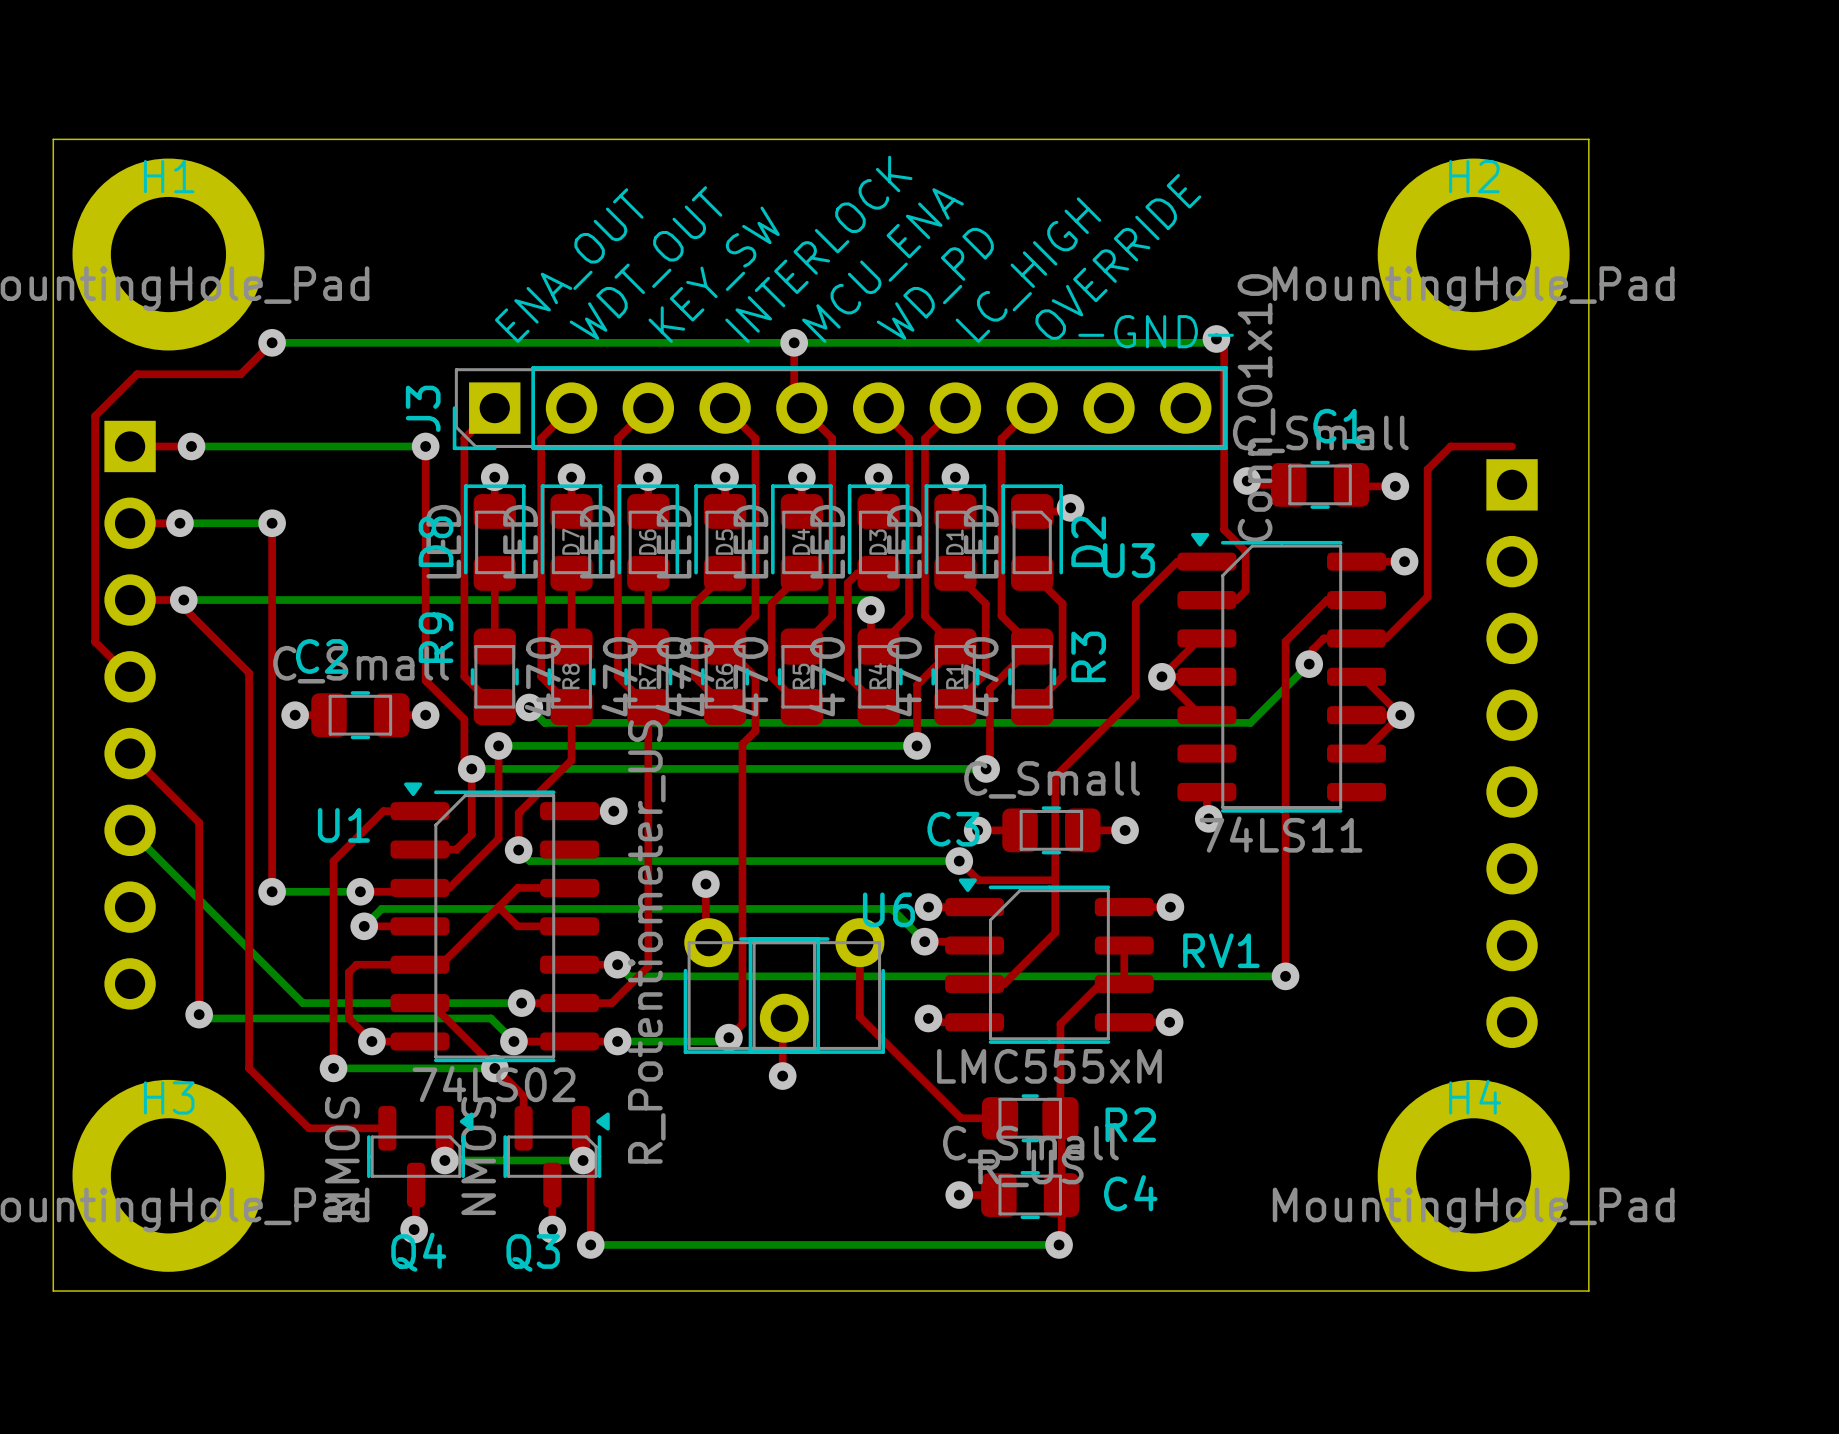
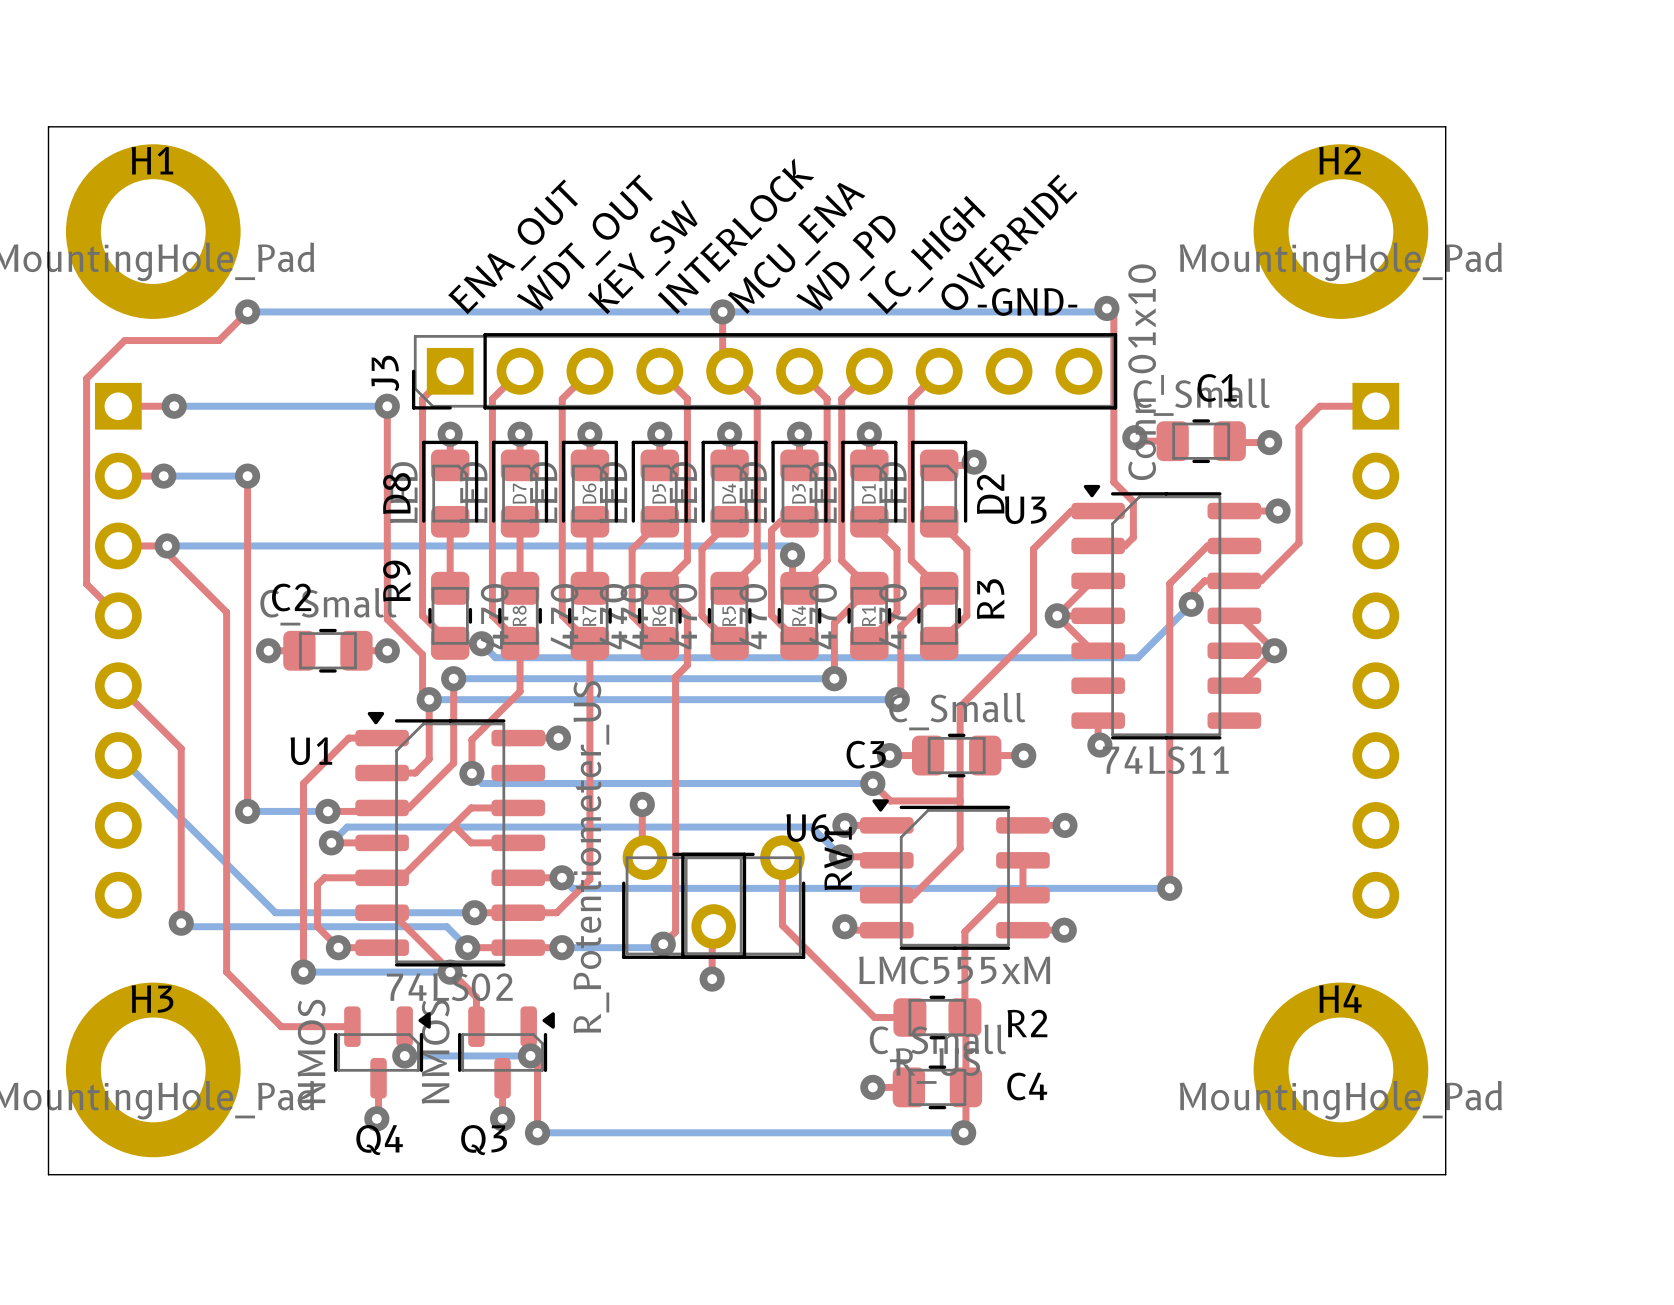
part position: (1512, 753) -> (1375, 650)
RV1 name rotation: 0° (1221, 950) -> 90° counterclockwise (838, 858)
RV1 name position: RV1 (1221, 950) -> RV1 (838, 858)

